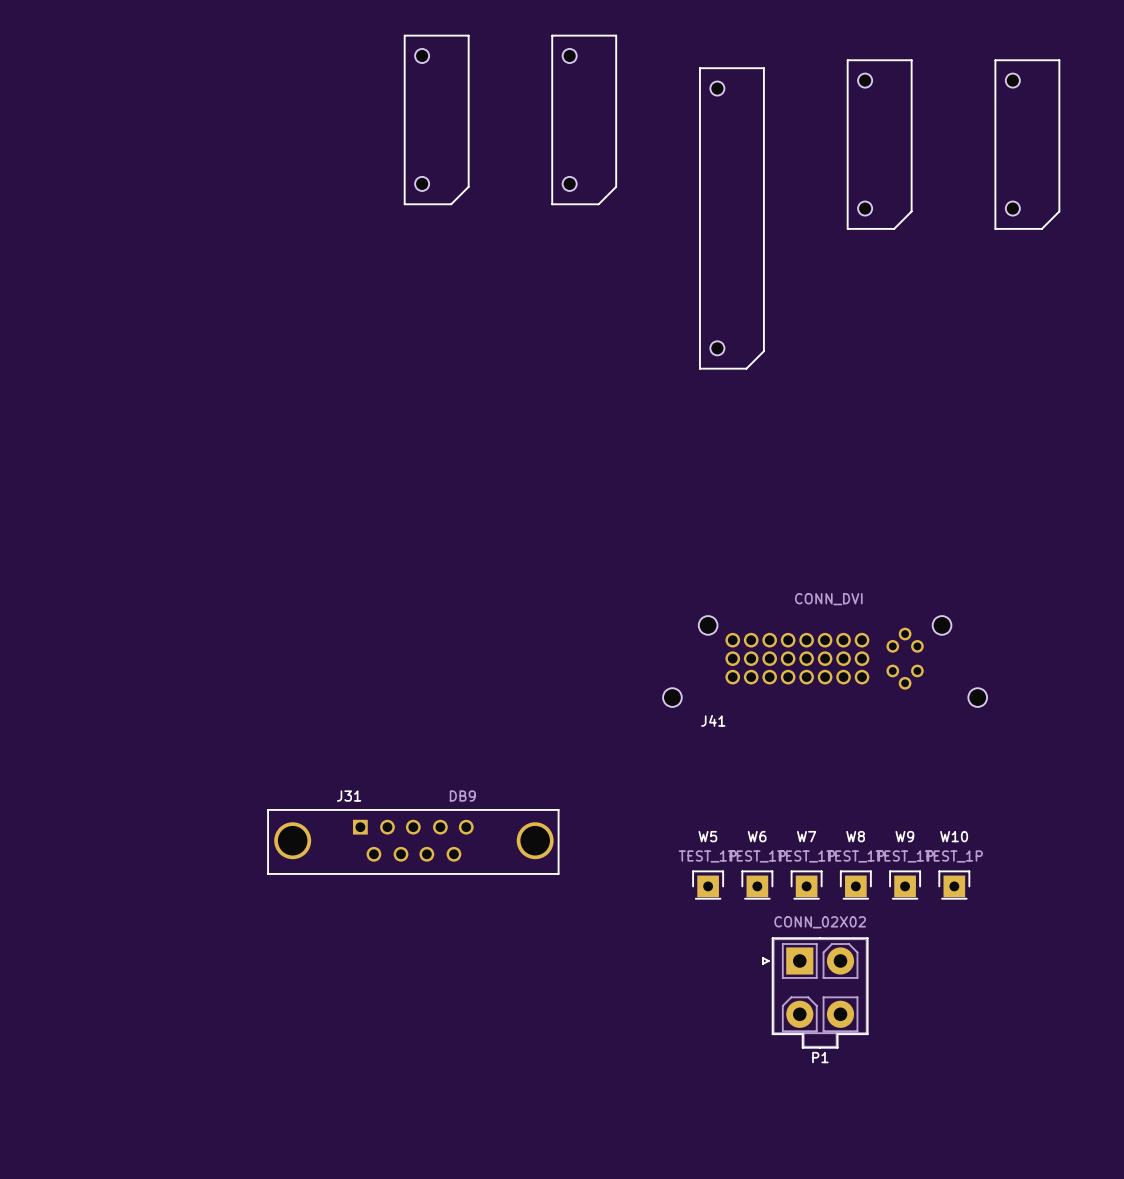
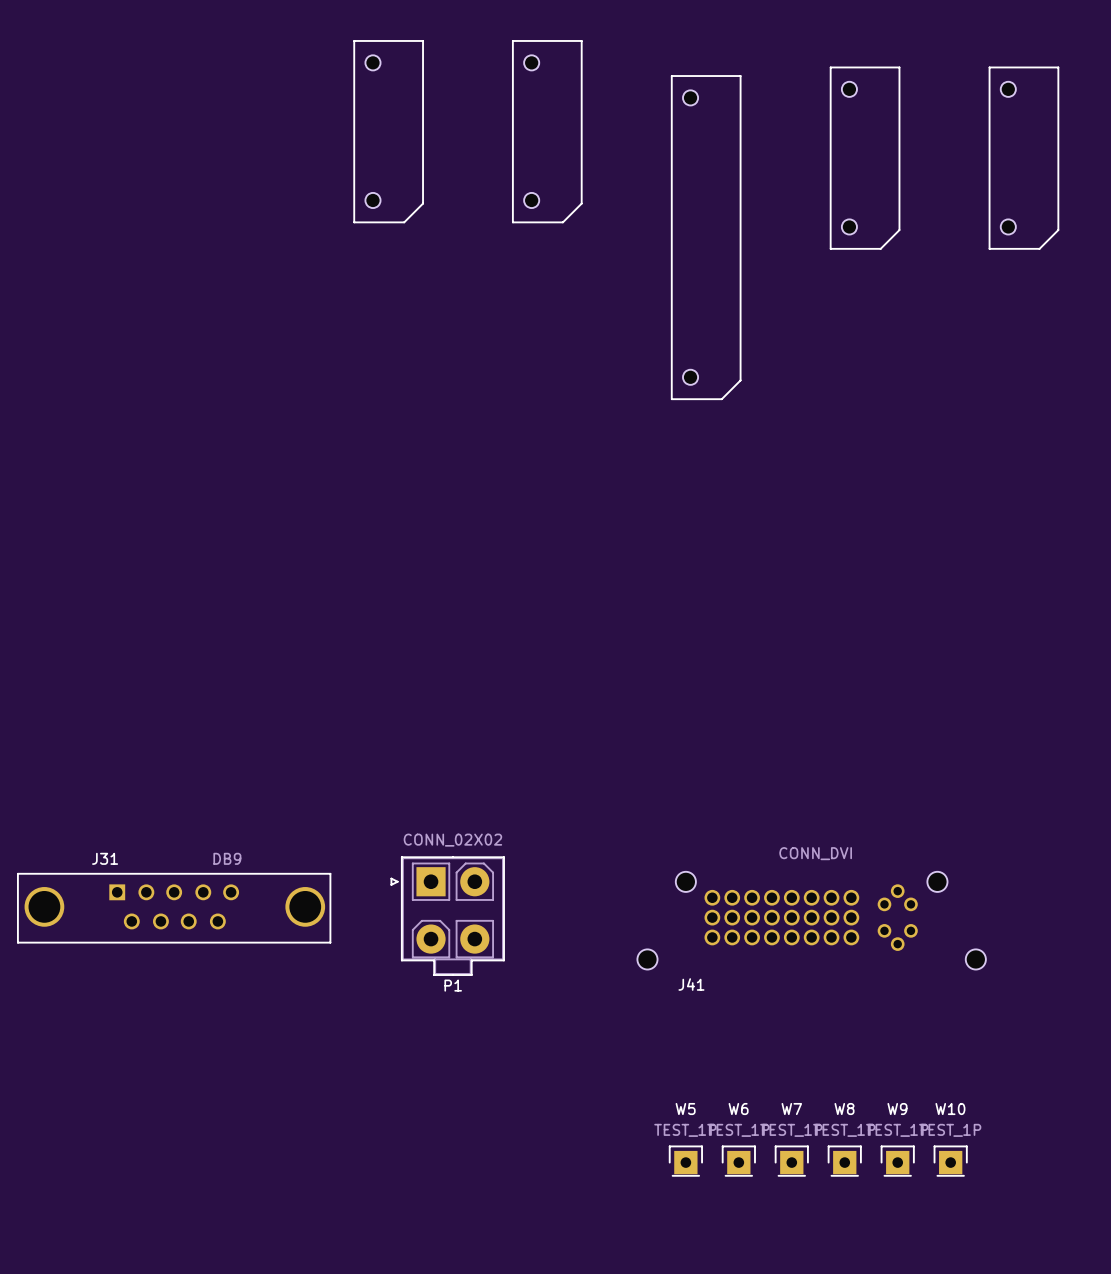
J41 position: (825, 661) -> (811, 920)
J31 position: (413, 841) -> (174, 908)
W5 position: (708, 885) -> (685, 1161)
W6 position: (757, 885) -> (738, 1161)
W7 position: (806, 885) -> (791, 1161)
W8 position: (855, 885) -> (844, 1161)
W9 position: (905, 885) -> (897, 1161)
W10 position: (954, 885) -> (950, 1161)
P1 position: (815, 992) -> (447, 916)

